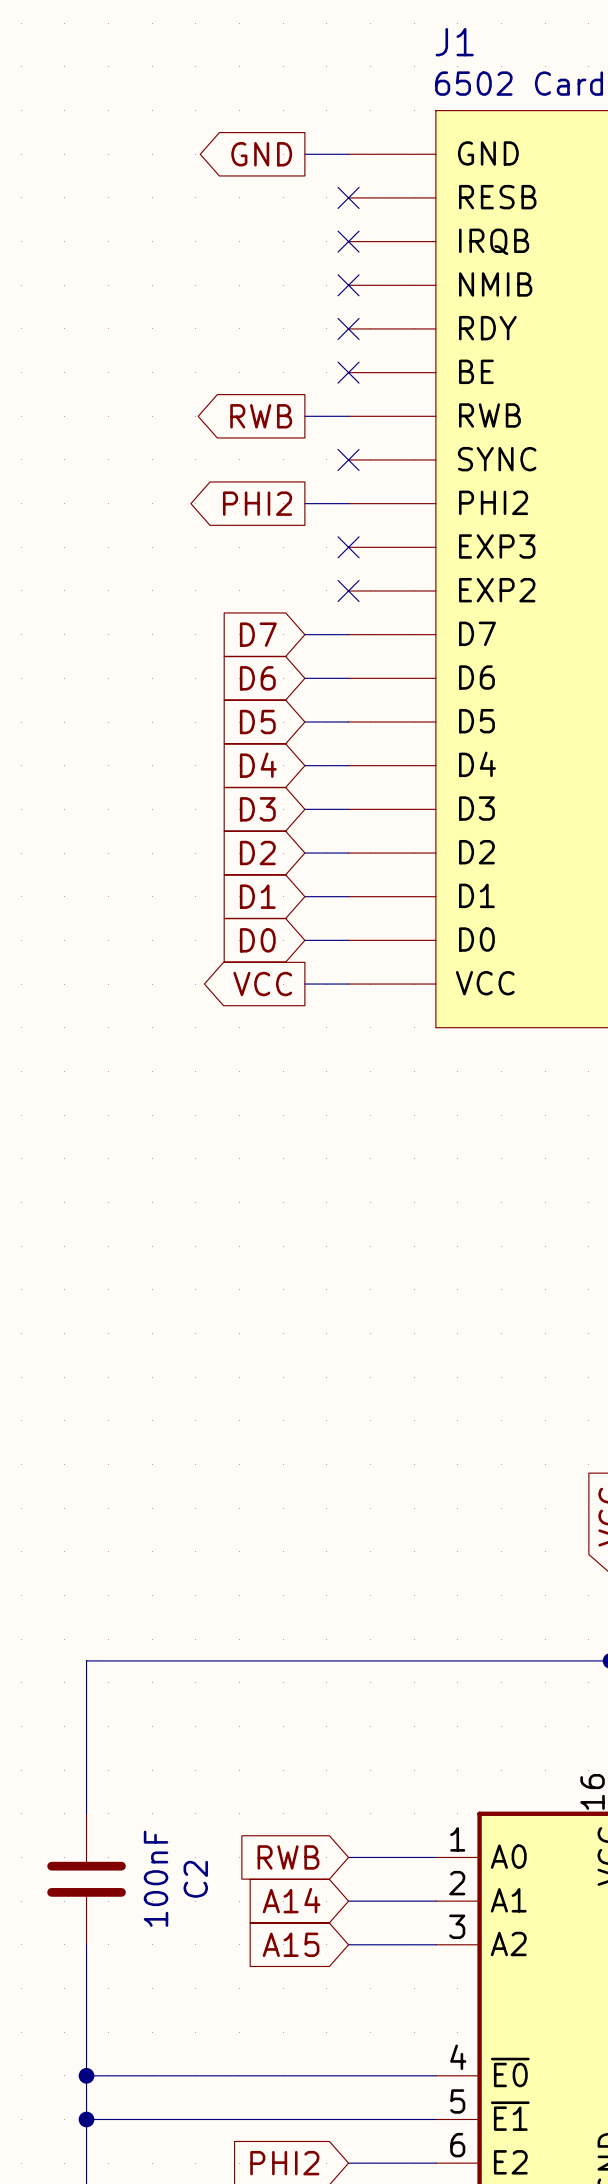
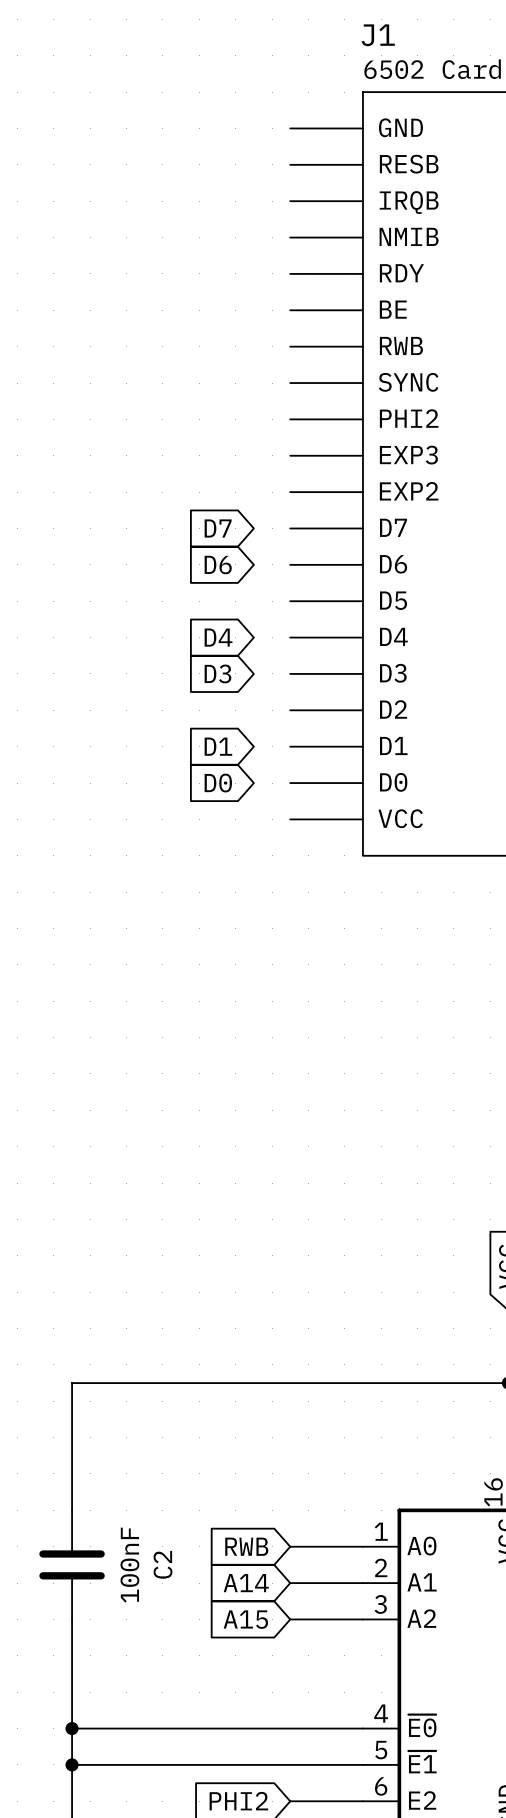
global label: GND (261, 154) -> none
wire: (304, 154) (348, 154) -> none
no-connect mark: (348, 197) -> none
no-connect mark: (348, 241) -> none
no-connect mark: (348, 285) -> none
no-connect mark: (348, 328) -> none
no-connect mark: (348, 372) -> none
global label: RWB (261, 416) -> none
wire: (304, 416) (348, 416) -> none
no-connect mark: (348, 459) -> none
global label: PHI2 (257, 503) -> none
wire: (304, 503) (348, 503) -> none
no-connect mark: (348, 547) -> none
no-connect mark: (348, 590) -> none
wire: (304, 634) (348, 634) -> none
wire: (304, 678) (348, 678) -> none
global label: D5 (257, 722) -> none
wire: (304, 722) (348, 722) -> none
wire: (304, 765) (348, 765) -> none
wire: (304, 809) (348, 809) -> none
global label: D2 (257, 853) -> none
wire: (304, 853) (348, 853) -> none
wire: (304, 896) (348, 896) -> none
wire: (304, 940) (348, 940) -> none
global label: VCC (262, 984) -> none
wire: (304, 984) (348, 984) -> none

